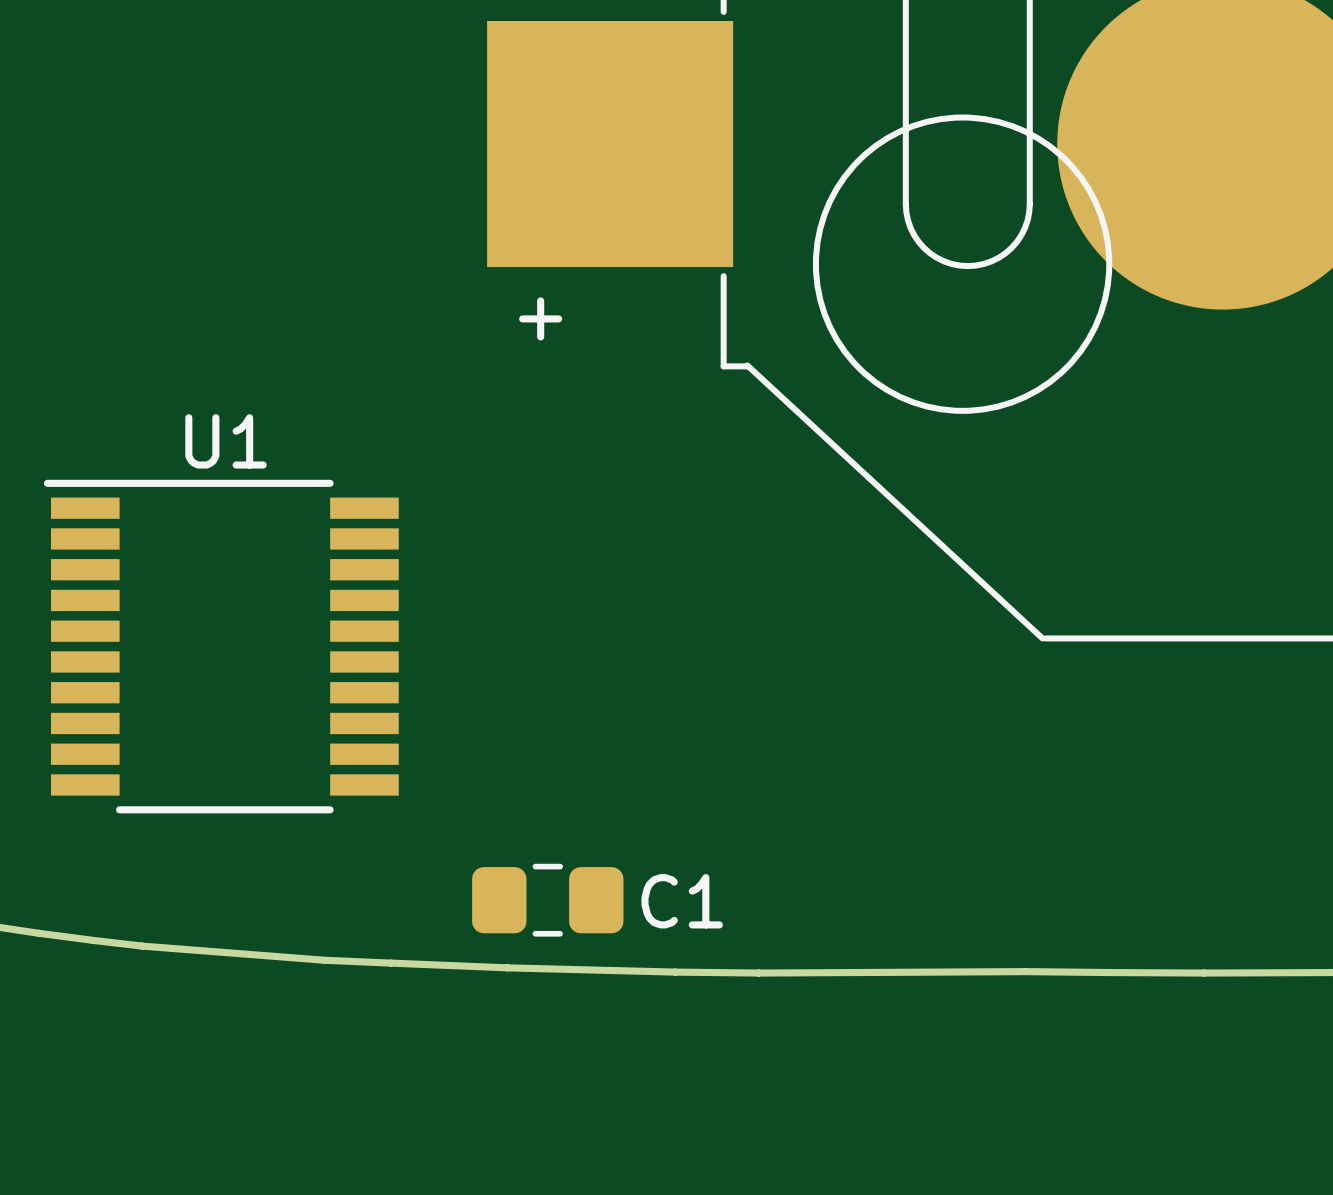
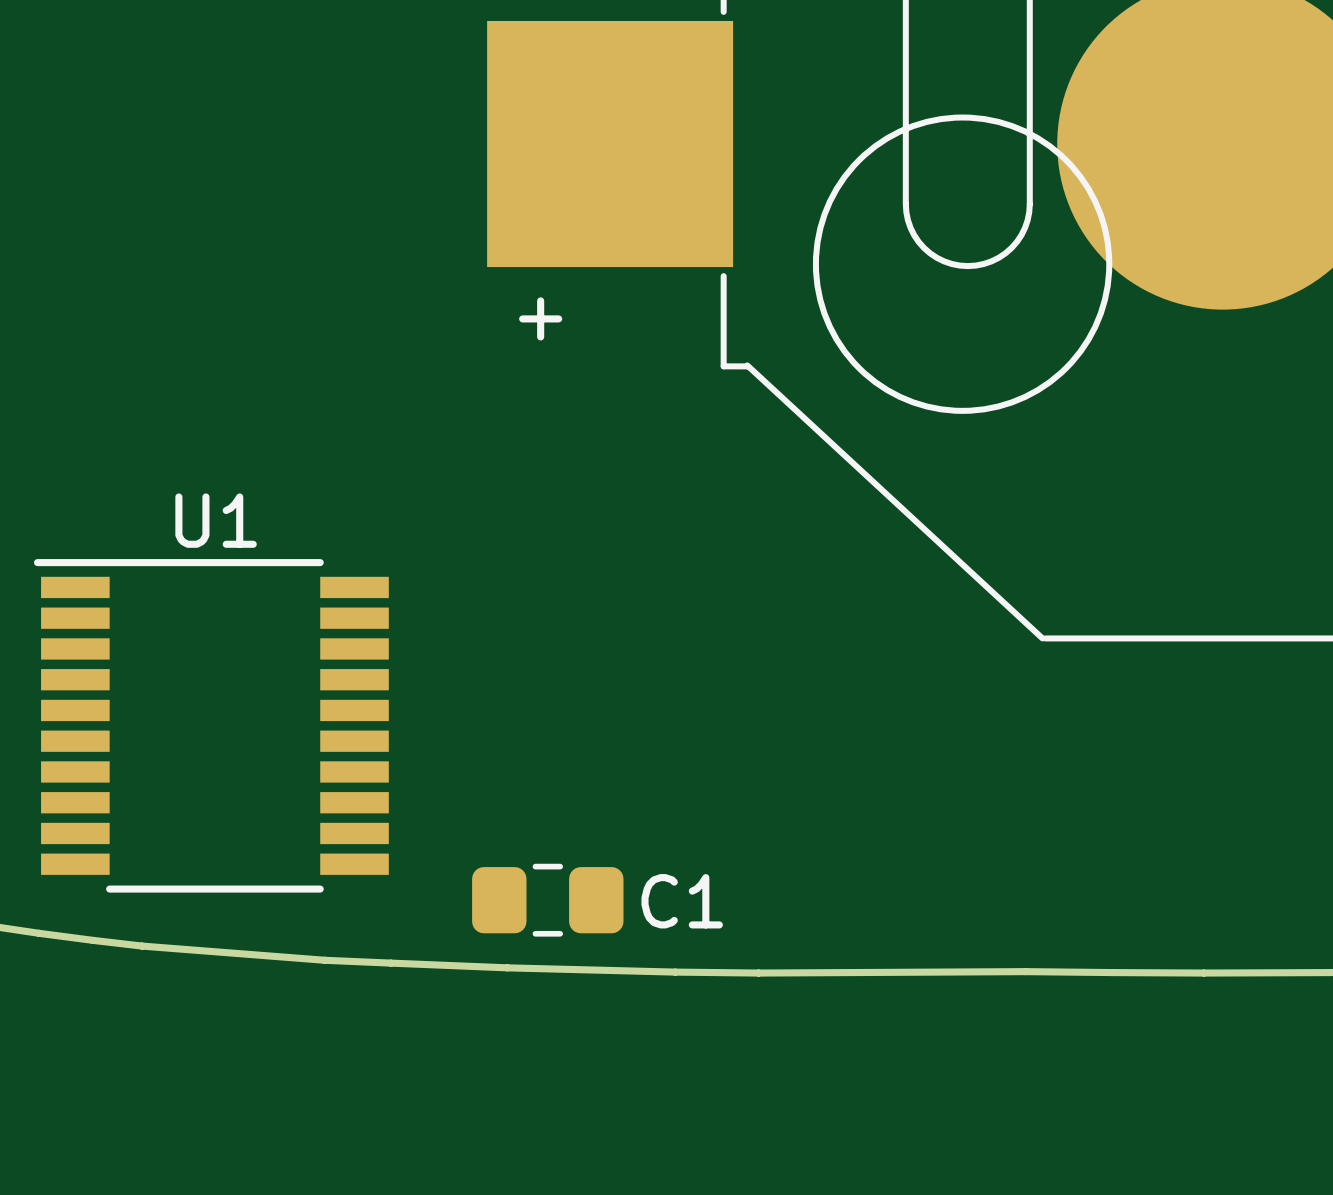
U1 position: (221, 646) -> (211, 725)

